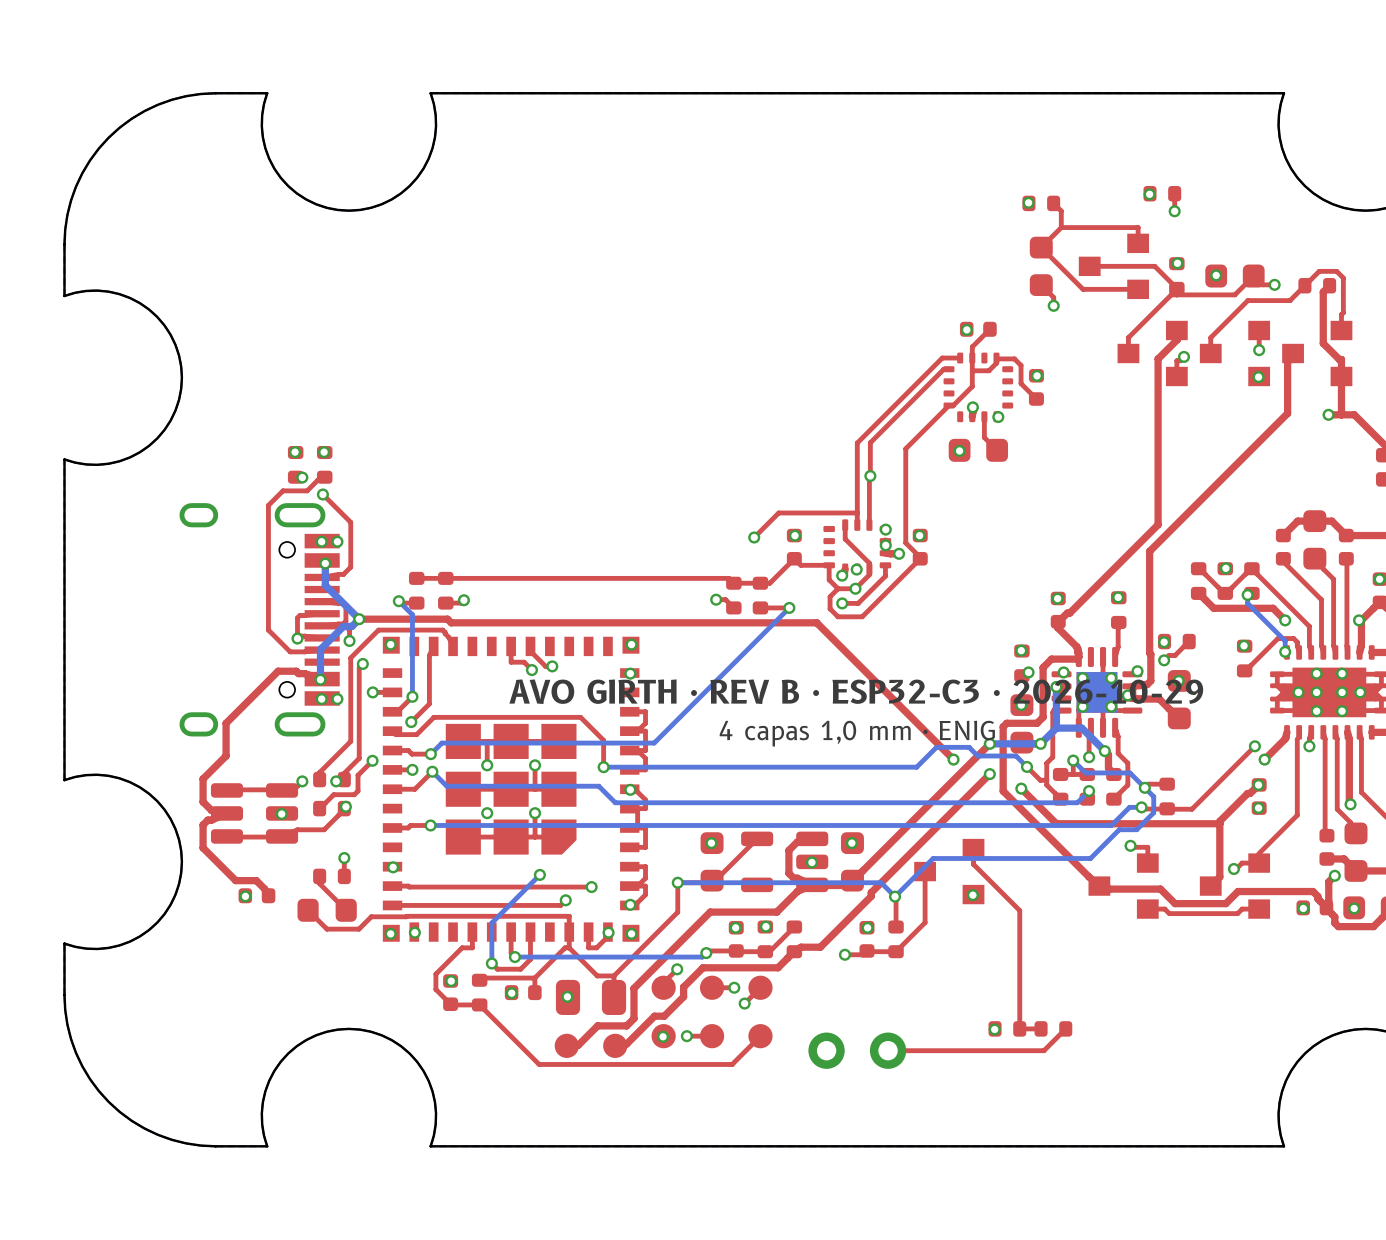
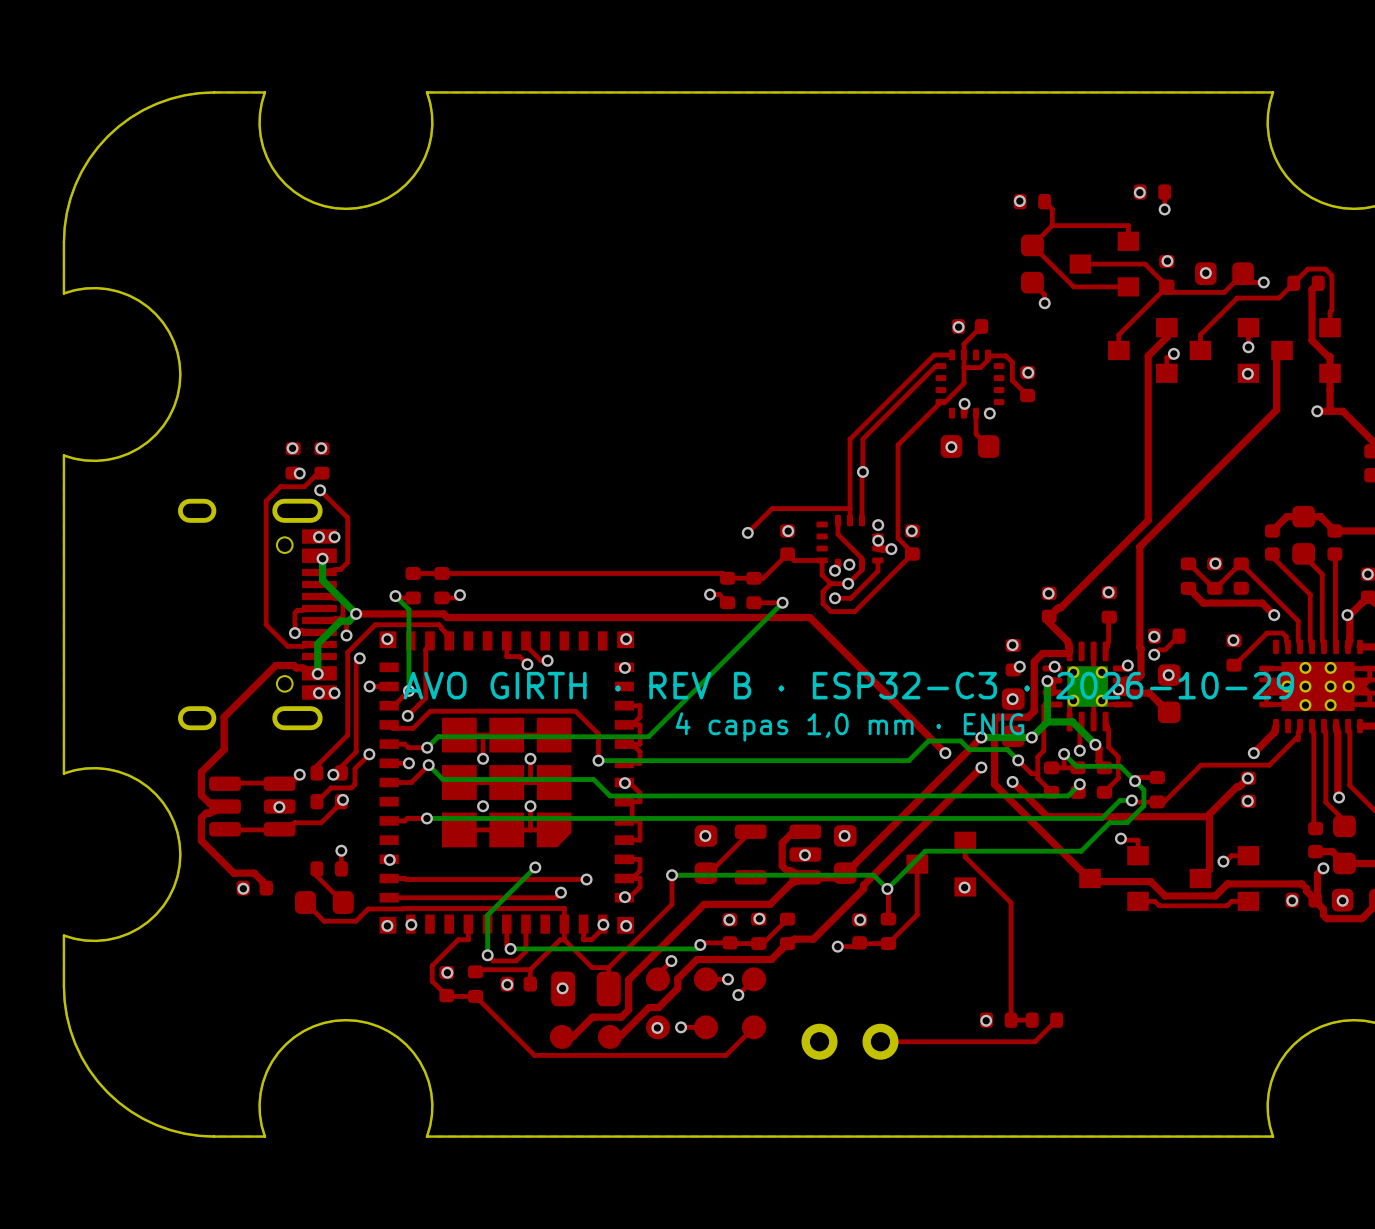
bottom track: (1247, 594) (1247, 603) (1285, 640) (1285, 651) -> none
via: (1247, 594) -> none
via: (1285, 651) -> none
top track: (1297, 739) (1297, 815) (1258, 854) -> none
top track: none -> (1298, 736) (1269, 765) (1201, 765) (1163, 802)
top track: (1254, 746) (1191, 809) (1175, 809) -> none
via: (1254, 746) -> none
via: (1309, 746) -> none

